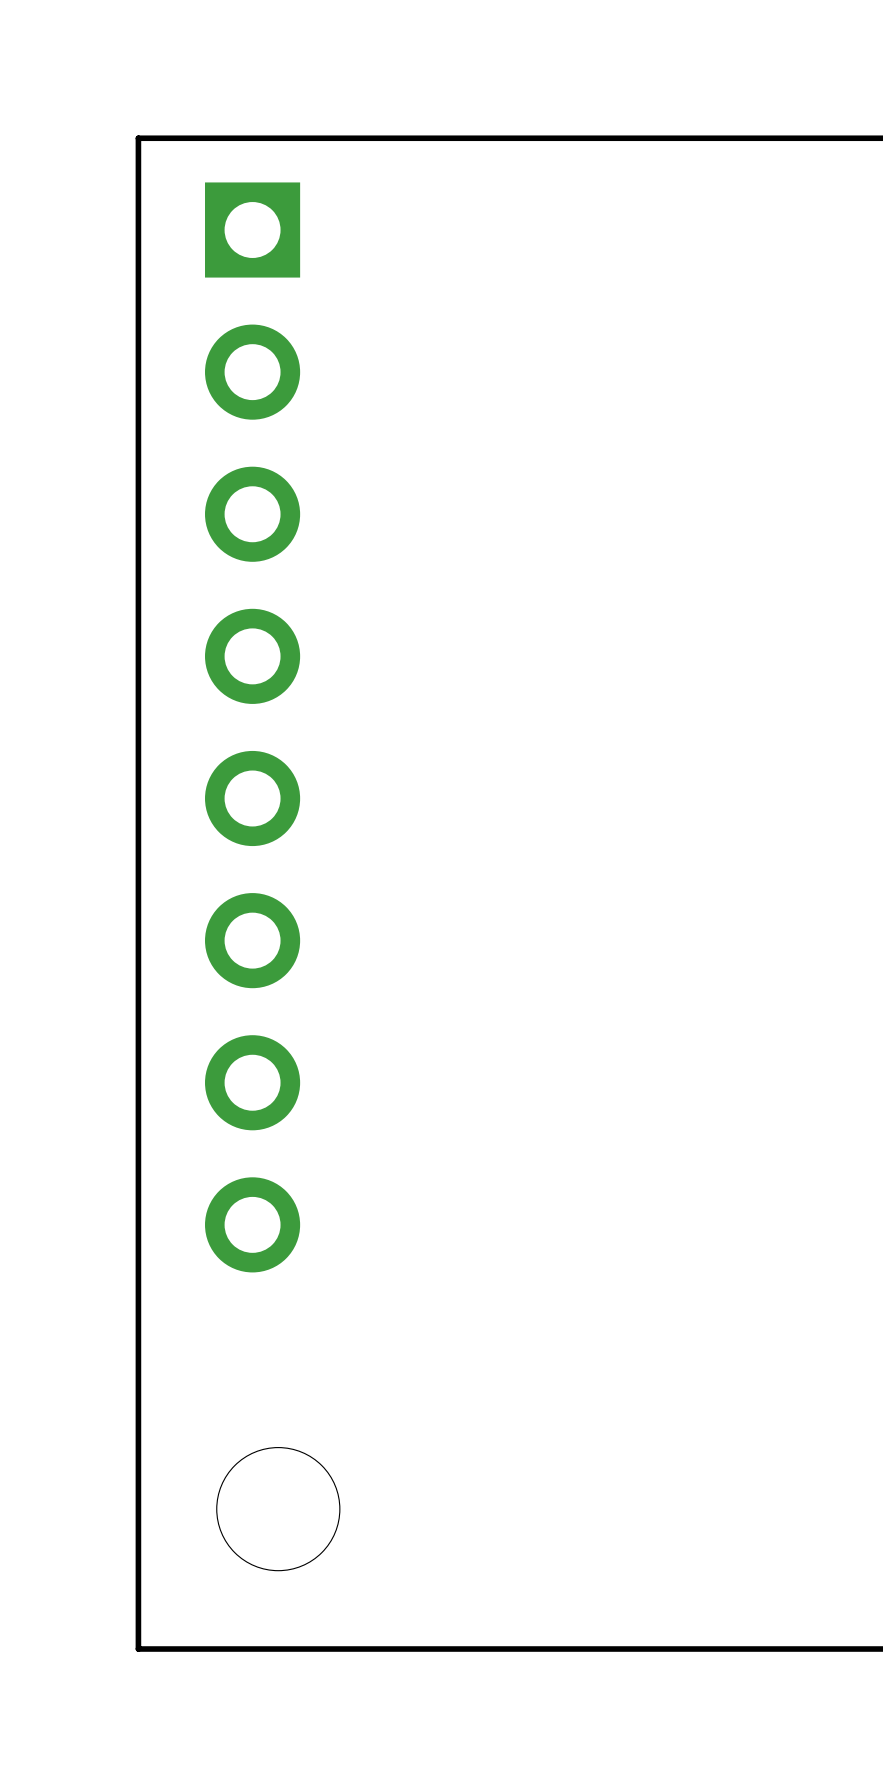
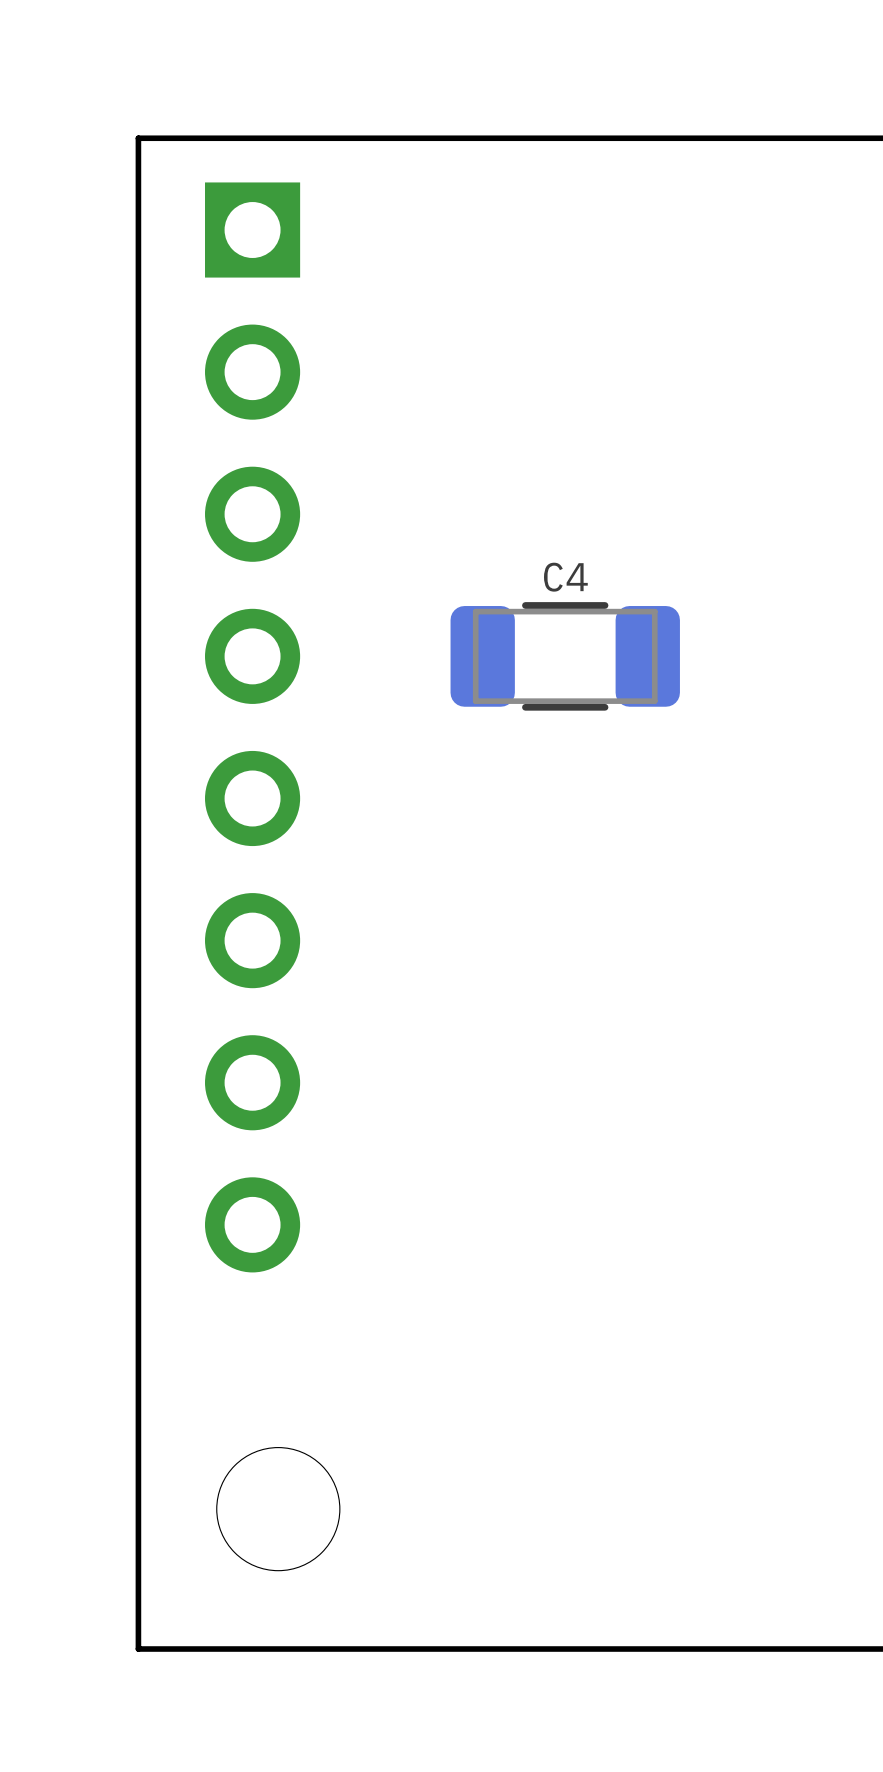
C4: none -> (565, 656)

